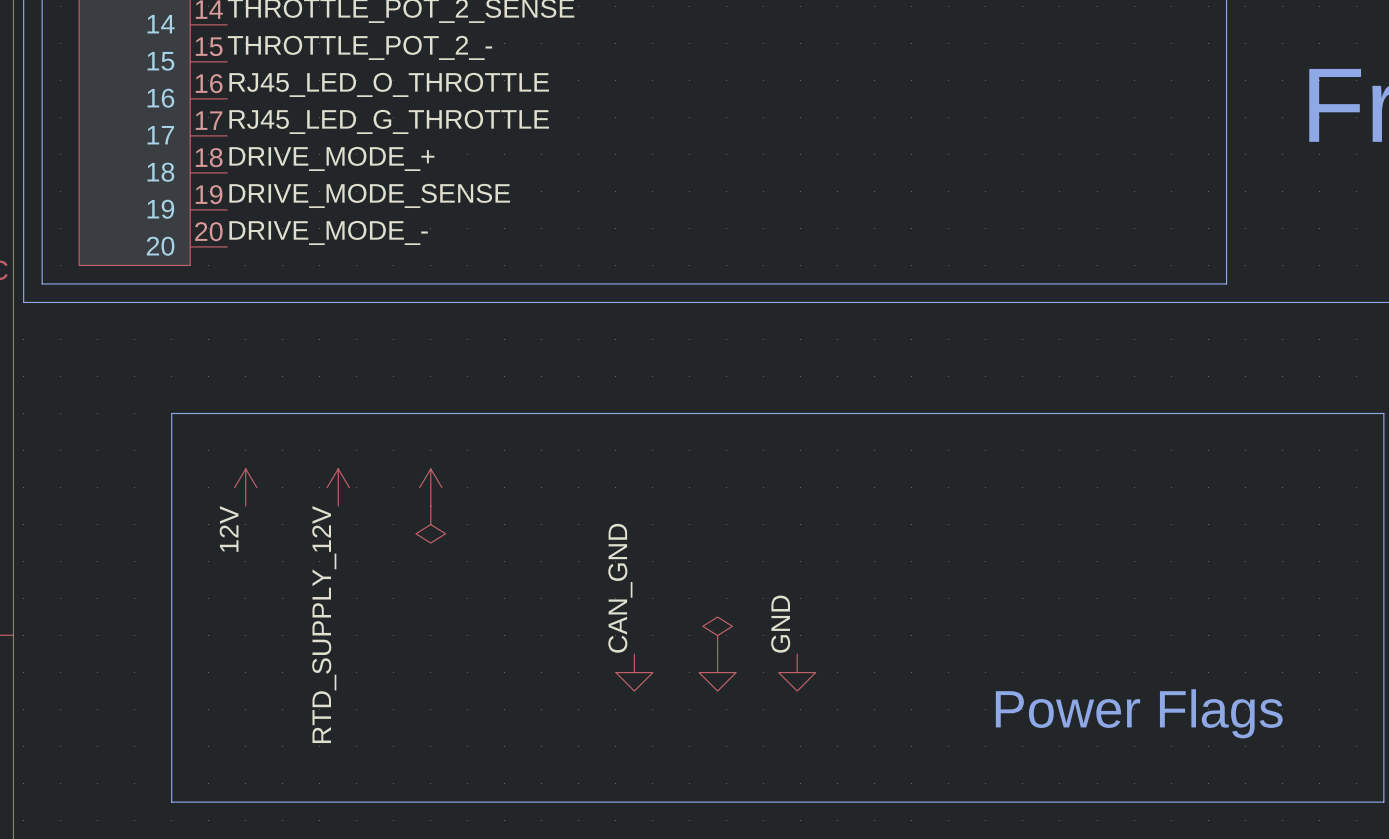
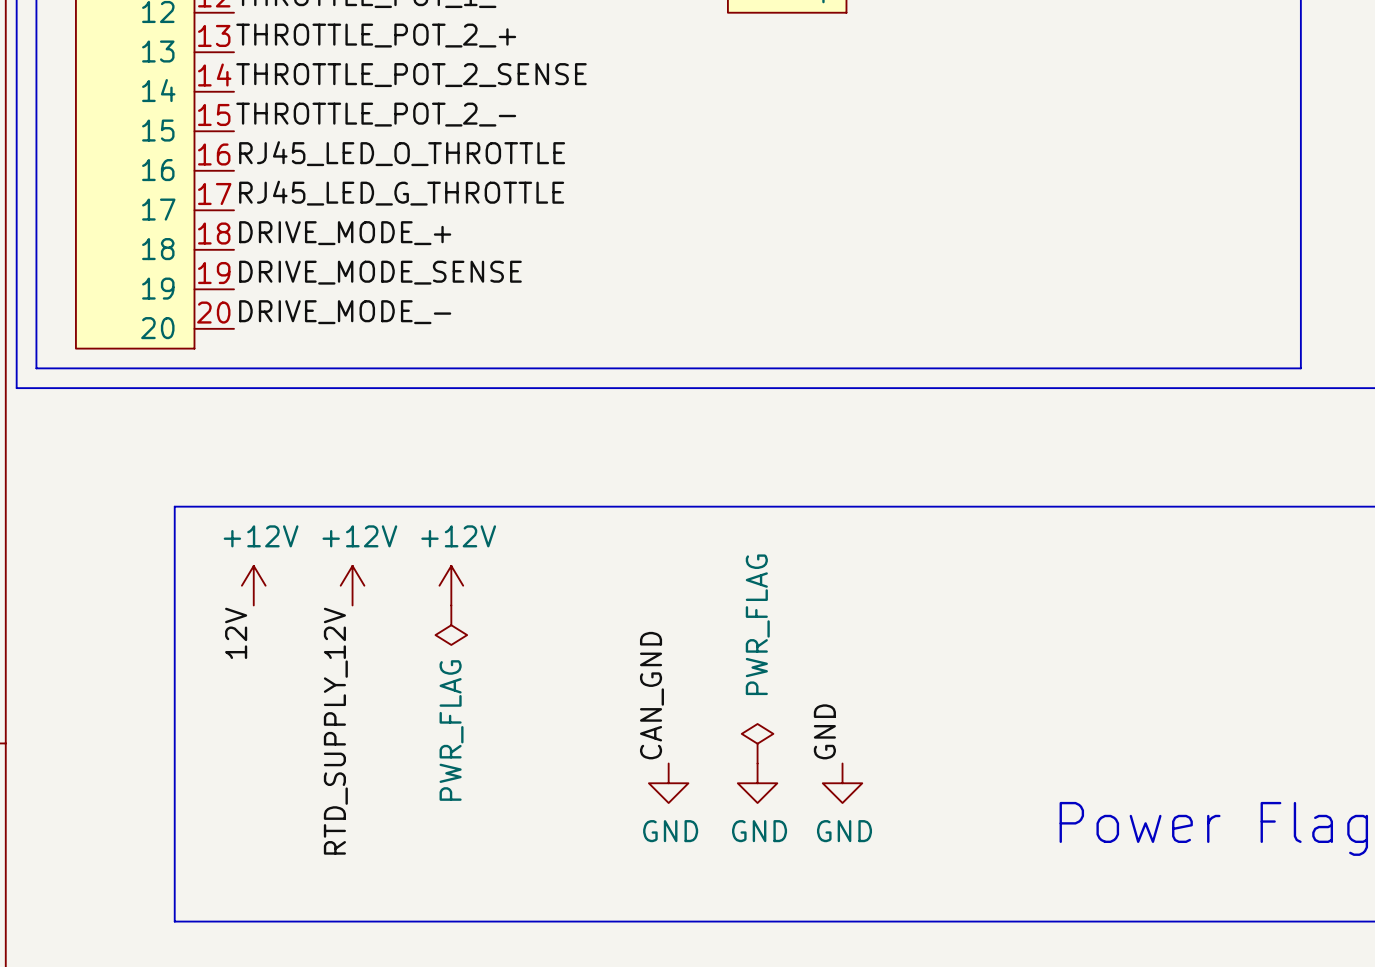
power symbol text: none -> +12V (261, 536)
power symbol text: none -> +12V (359, 536)
power symbol text: none -> +12V (458, 536)
power symbol text: none -> PWR_FLAG (757, 624)
power symbol text: none -> PWR_FLAG (451, 730)
power symbol text: none -> GND (670, 831)
power symbol text: none -> GND (759, 831)
power symbol text: none -> GND (844, 831)

